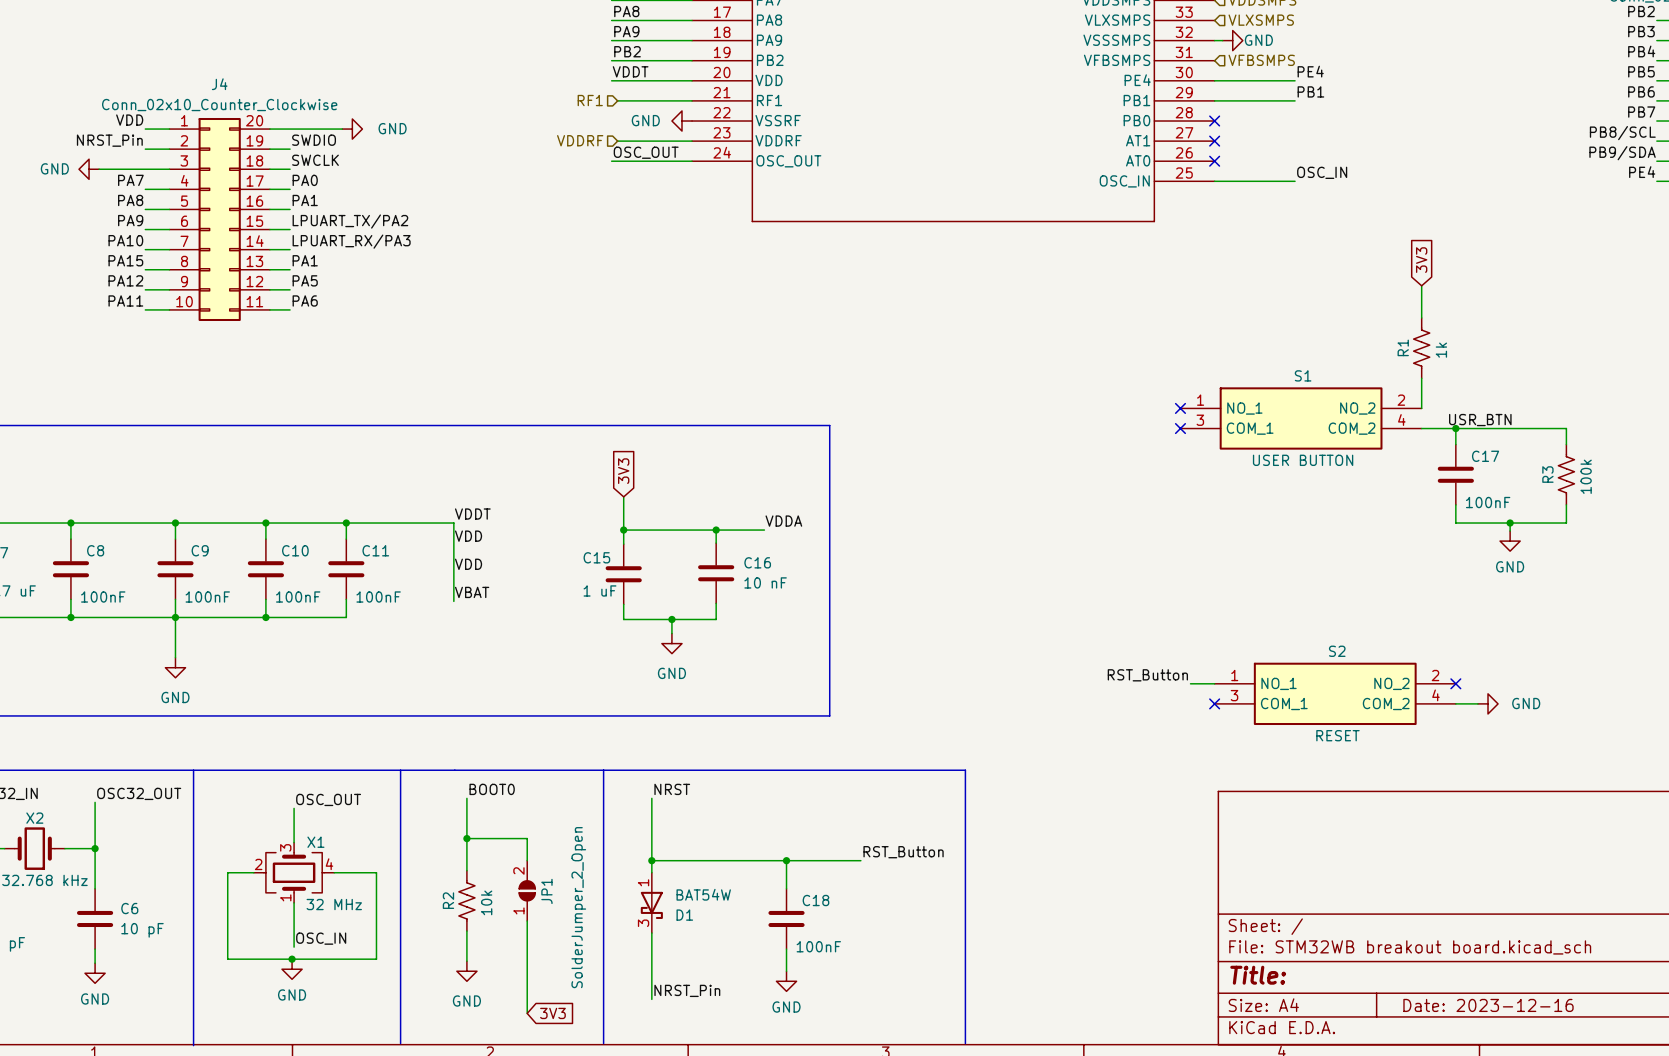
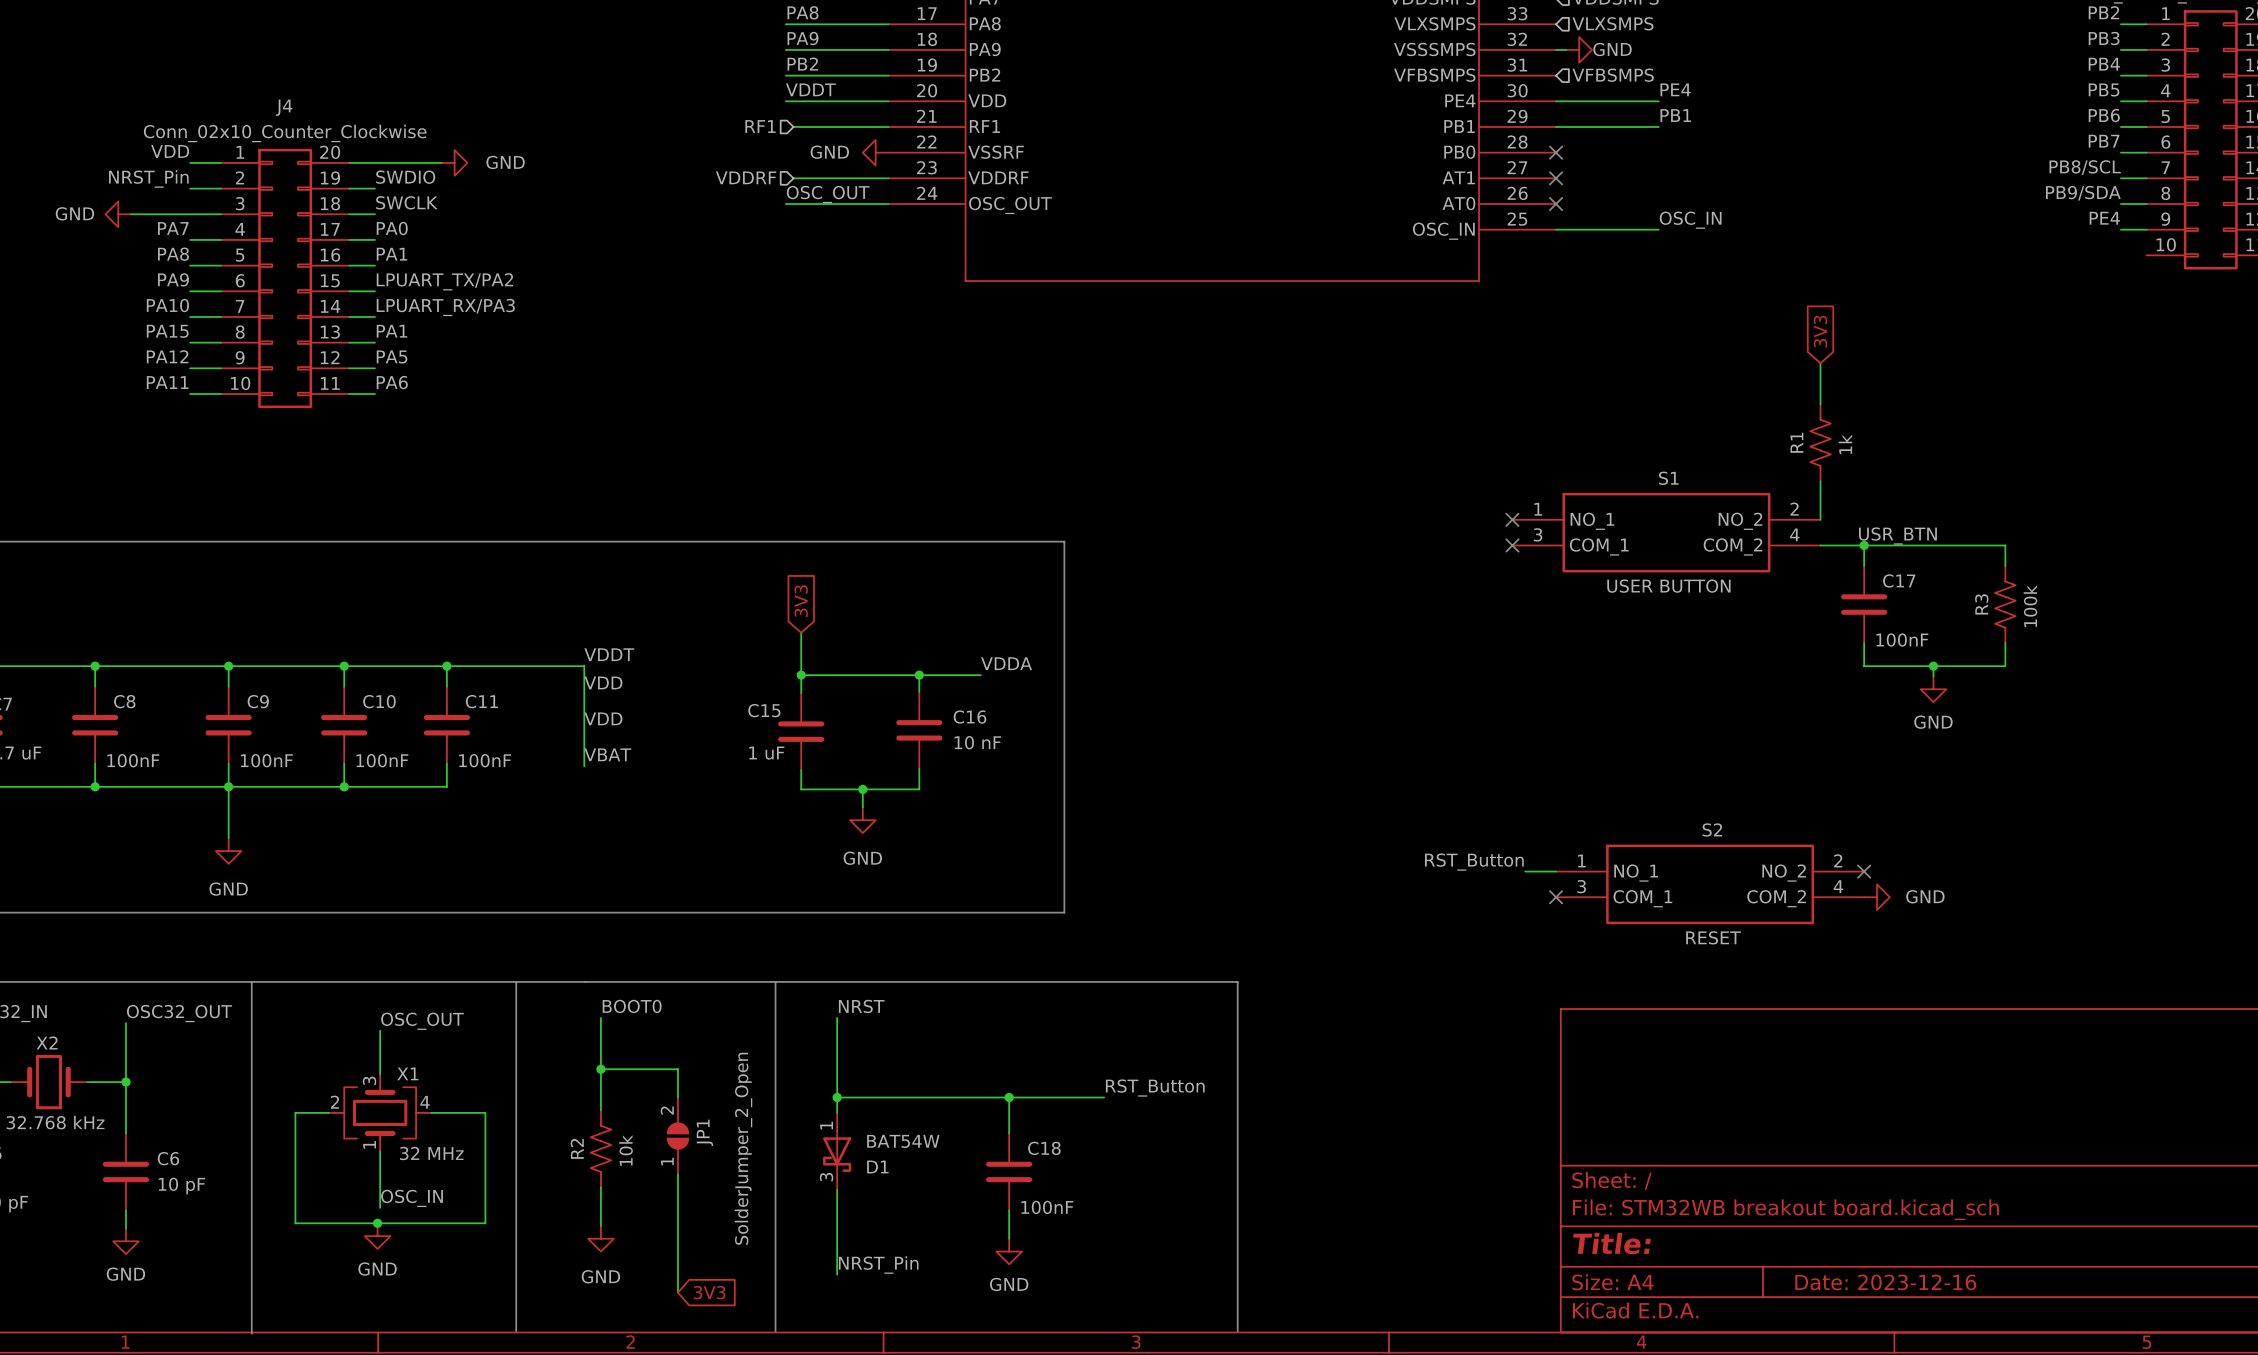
power symbol position: GND (1488, 703) -> GND (1876, 897)

